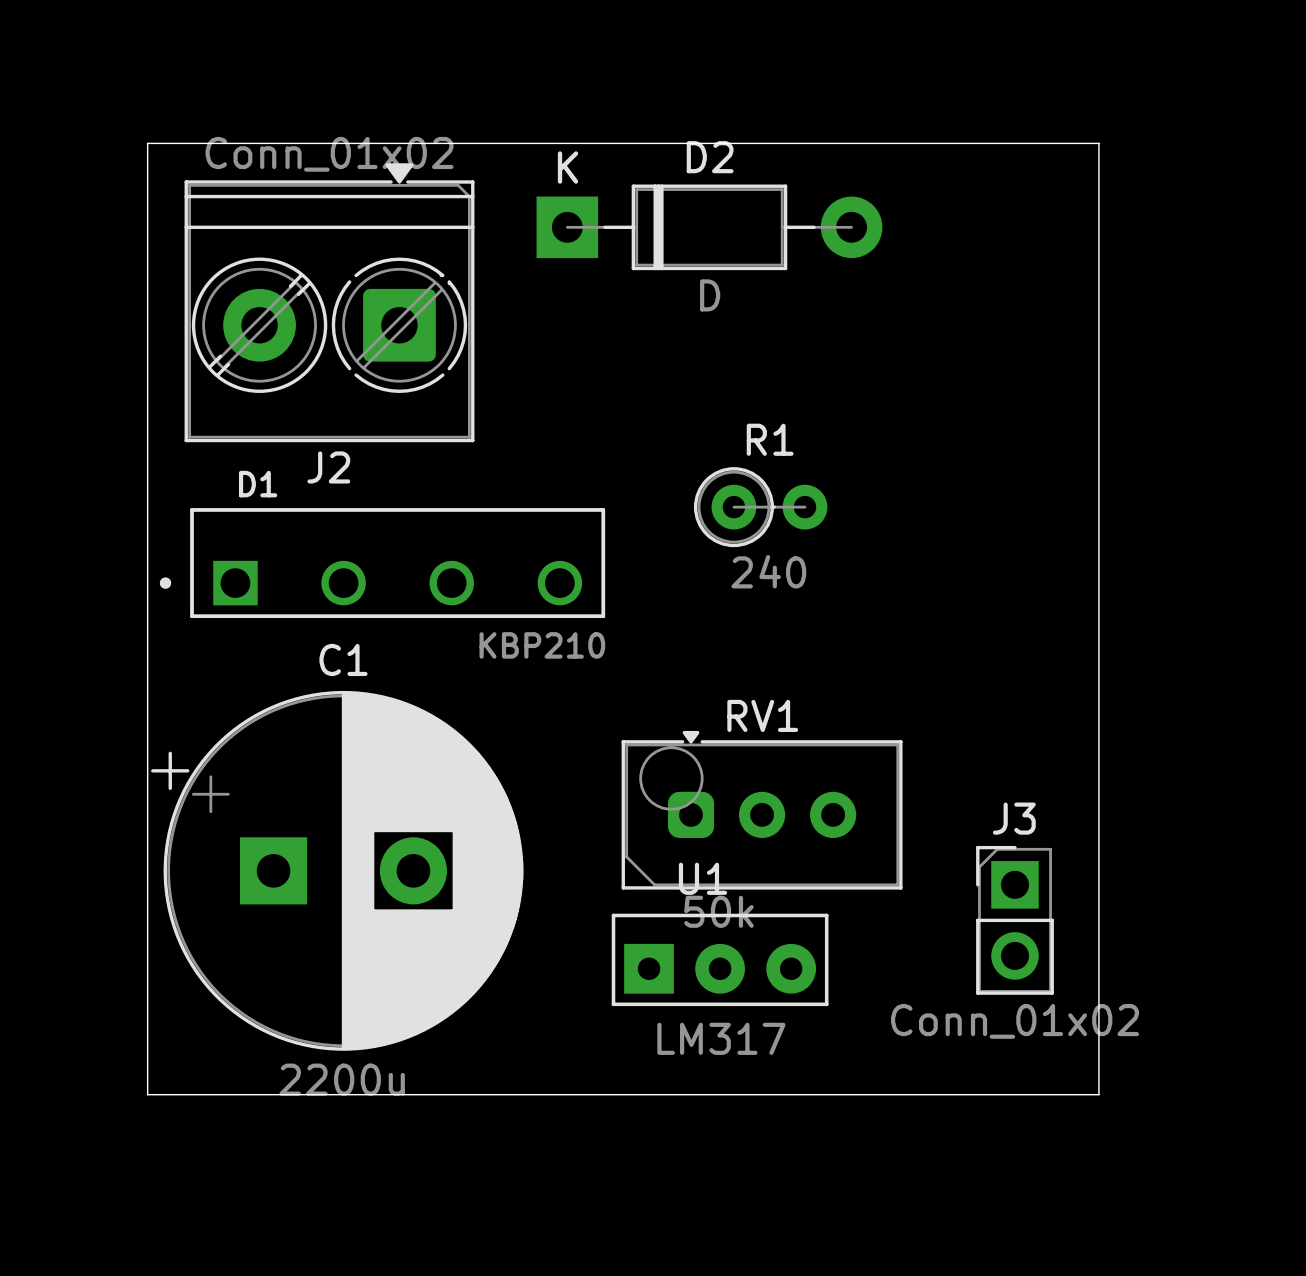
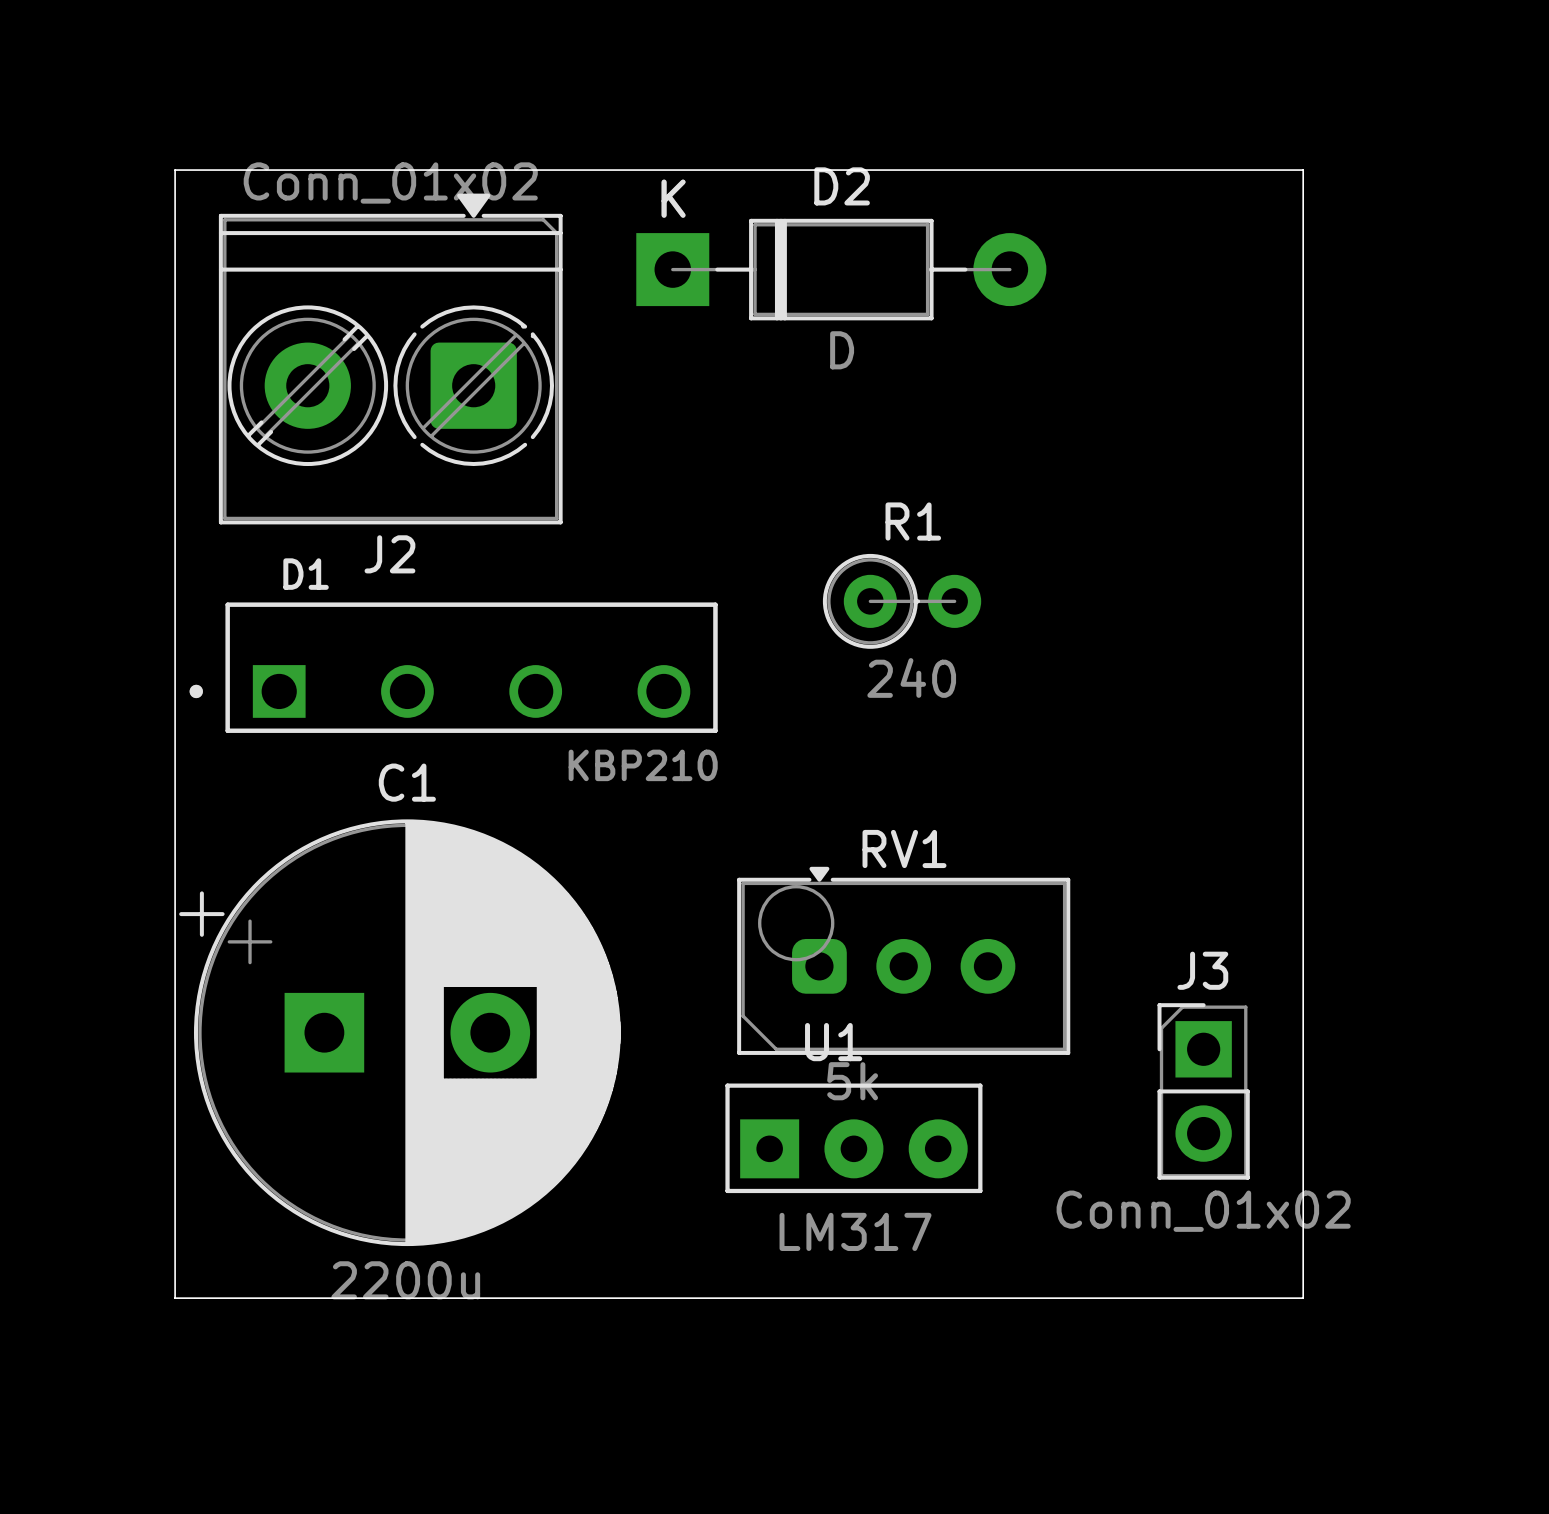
RV1 value: 50k (718, 911) -> 5k (852, 1081)

